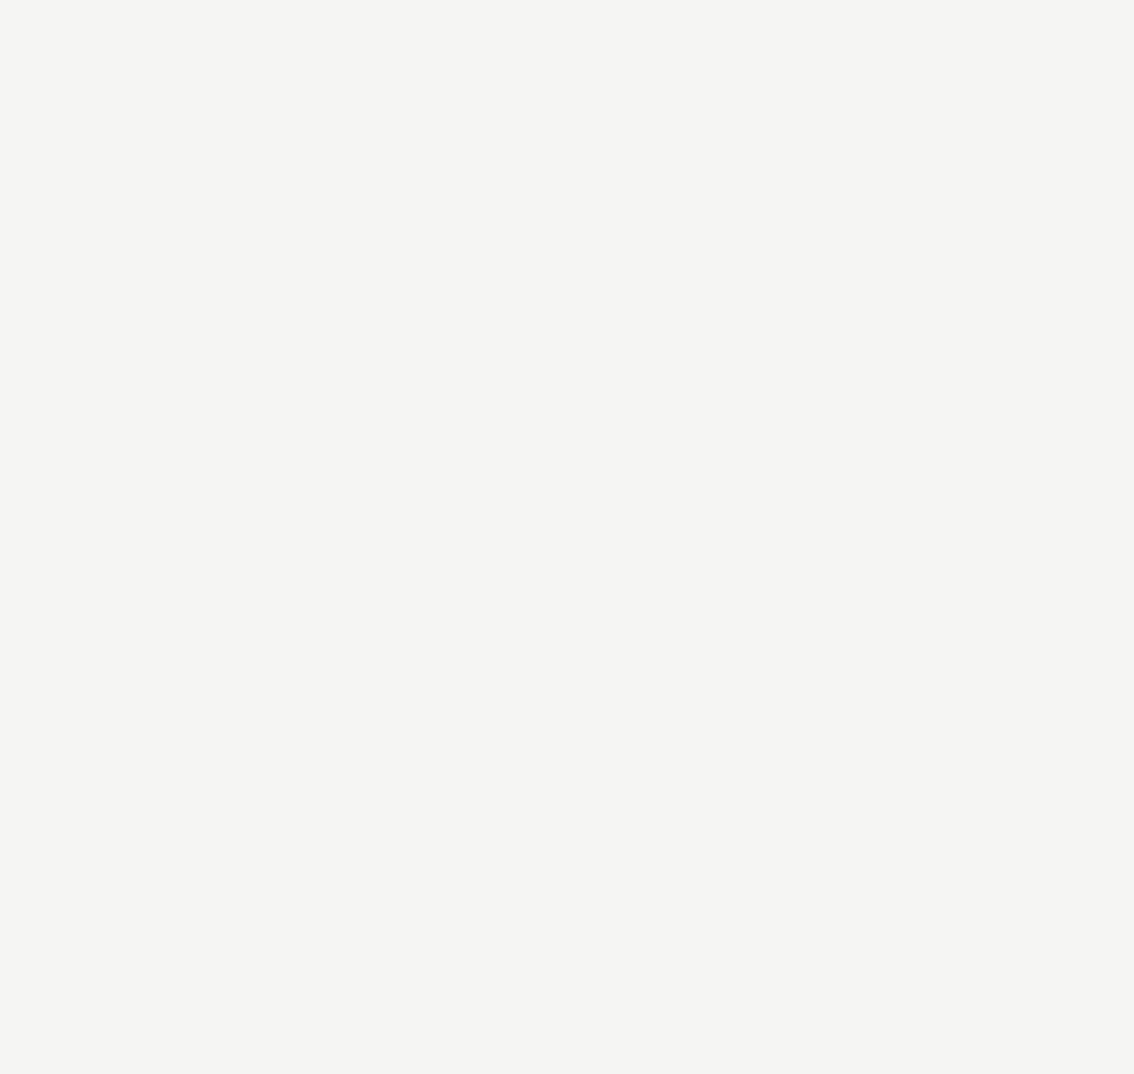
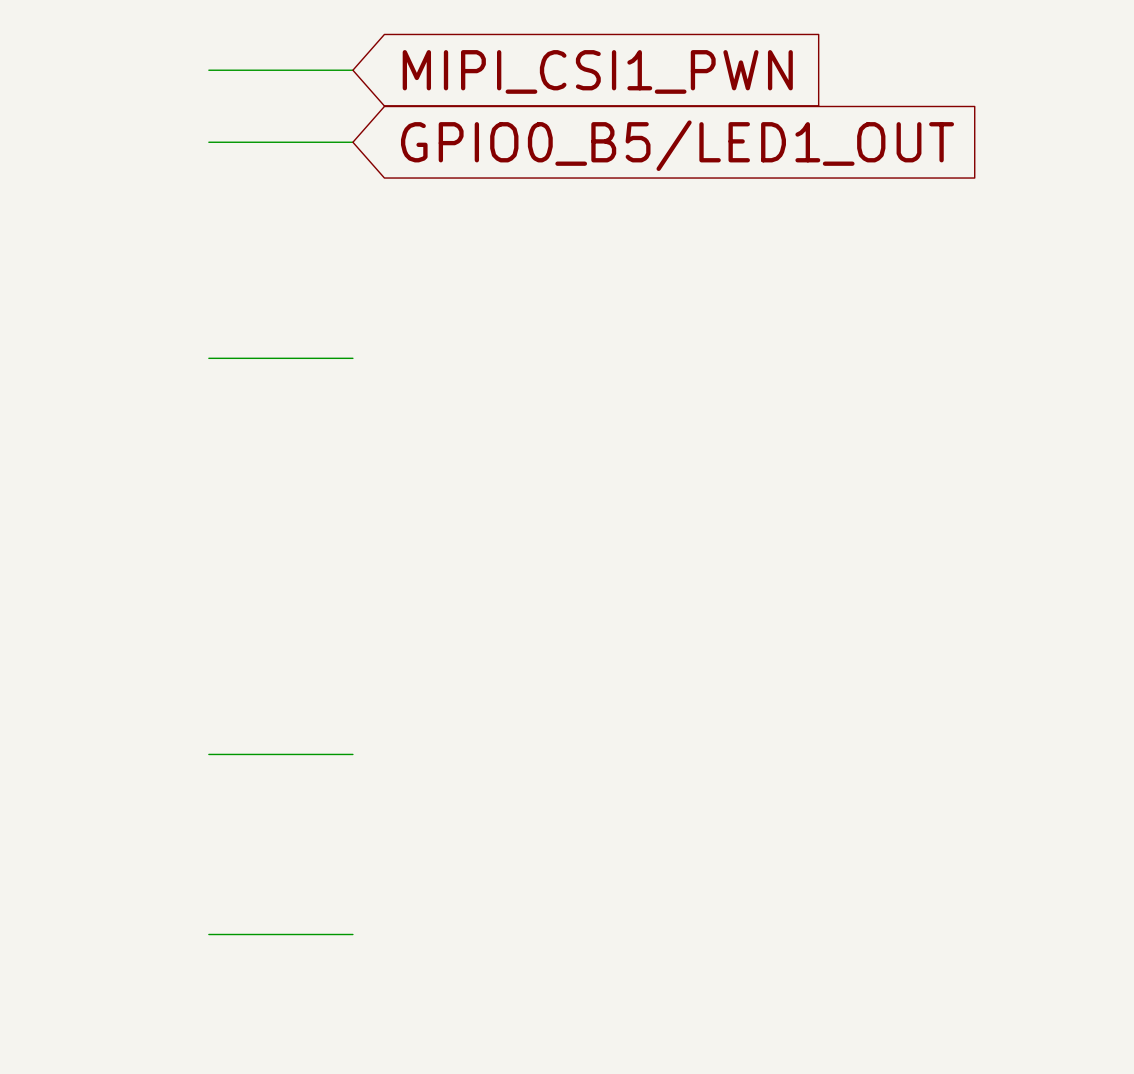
wire: none -> (208, 70) (352, 70)
global label: none -> MIPI_CSI1_PWN (597, 71)
wire: none -> (208, 142) (352, 142)
global label: none -> GPIO0_B5/LED1_OUT (677, 145)
wire: none -> (208, 358) (352, 358)
wire: none -> (208, 754) (352, 754)
wire: none -> (208, 934) (352, 934)

